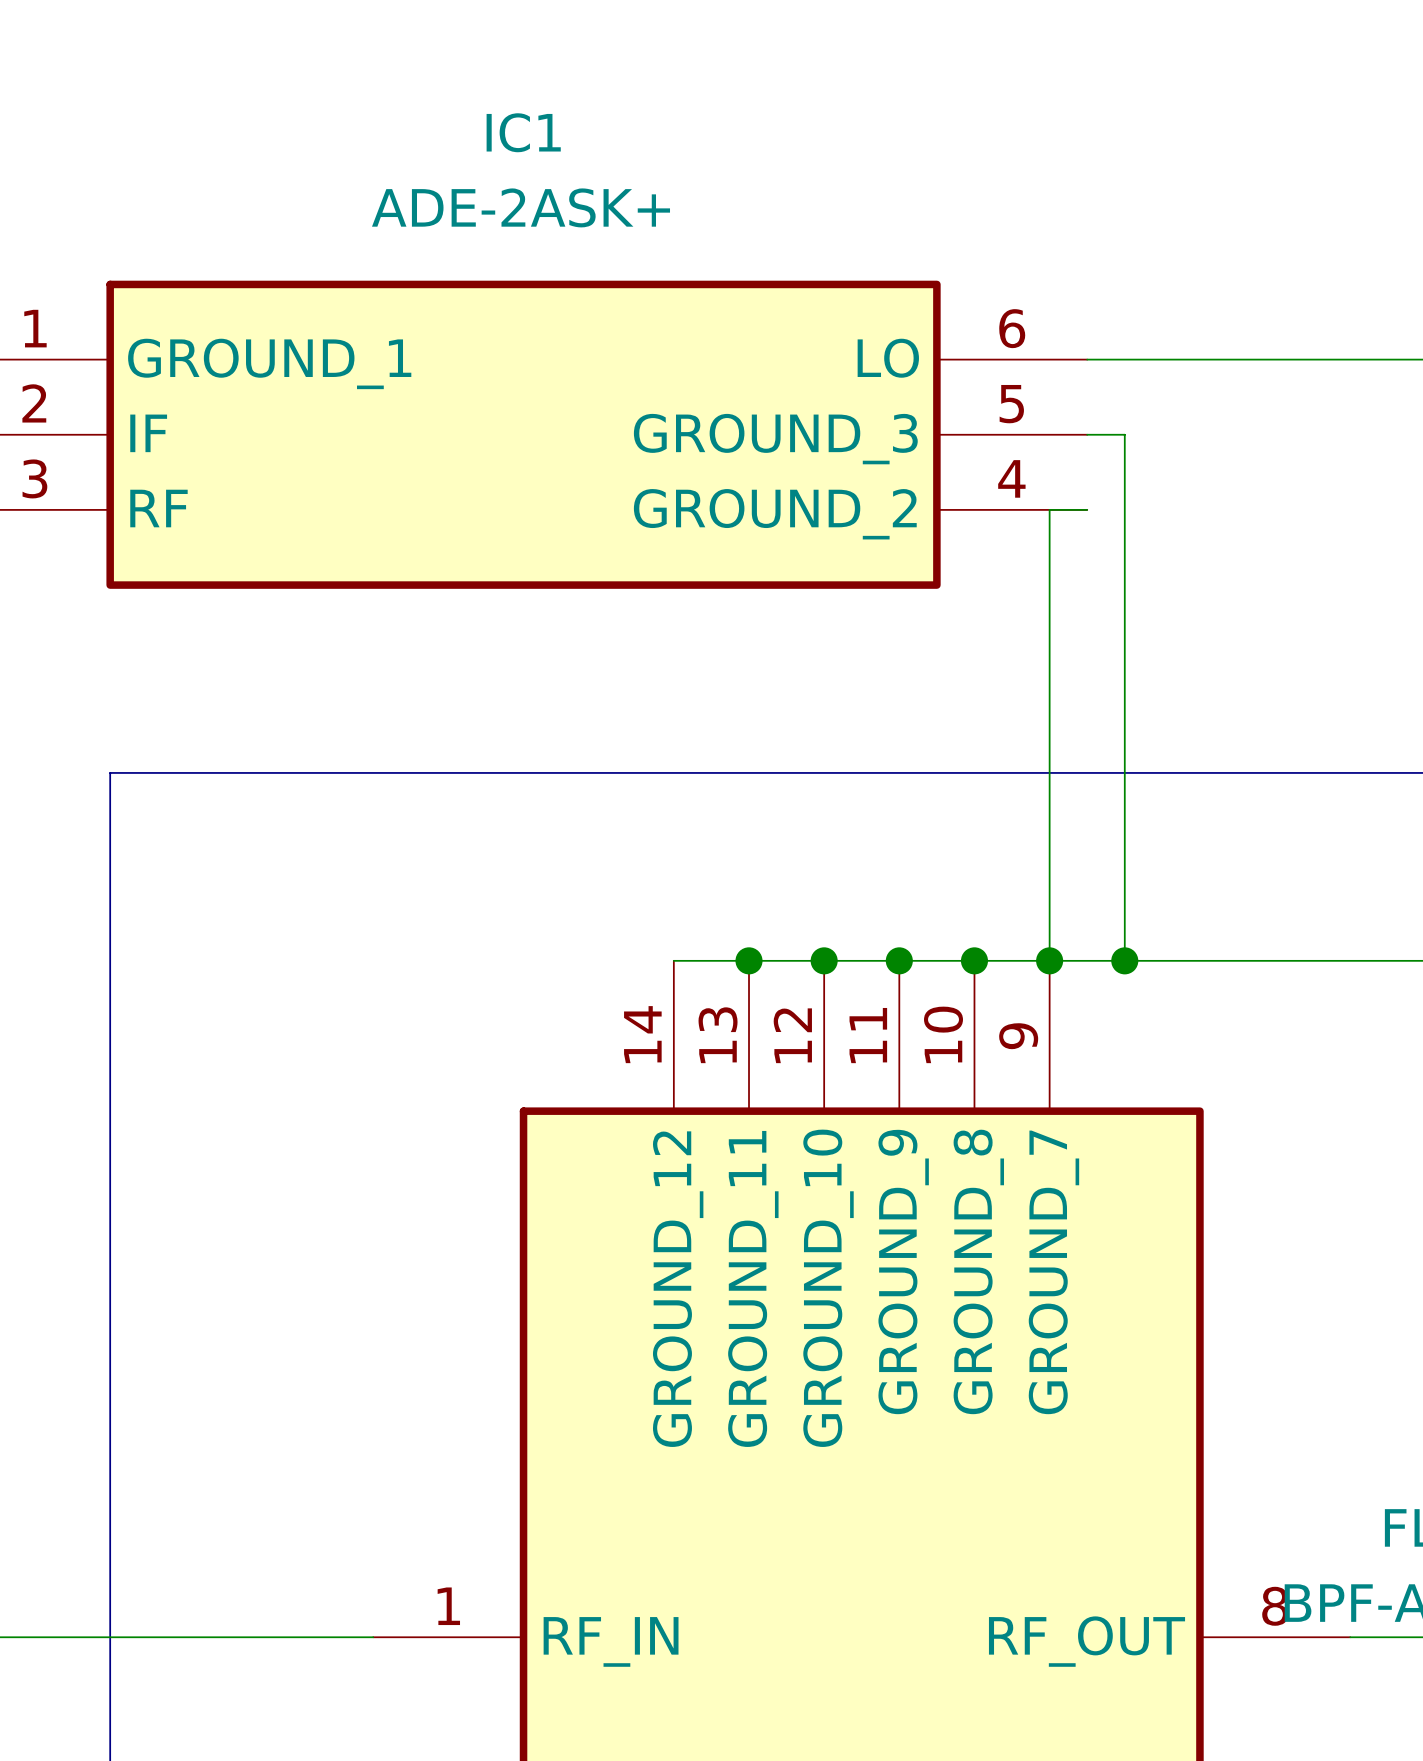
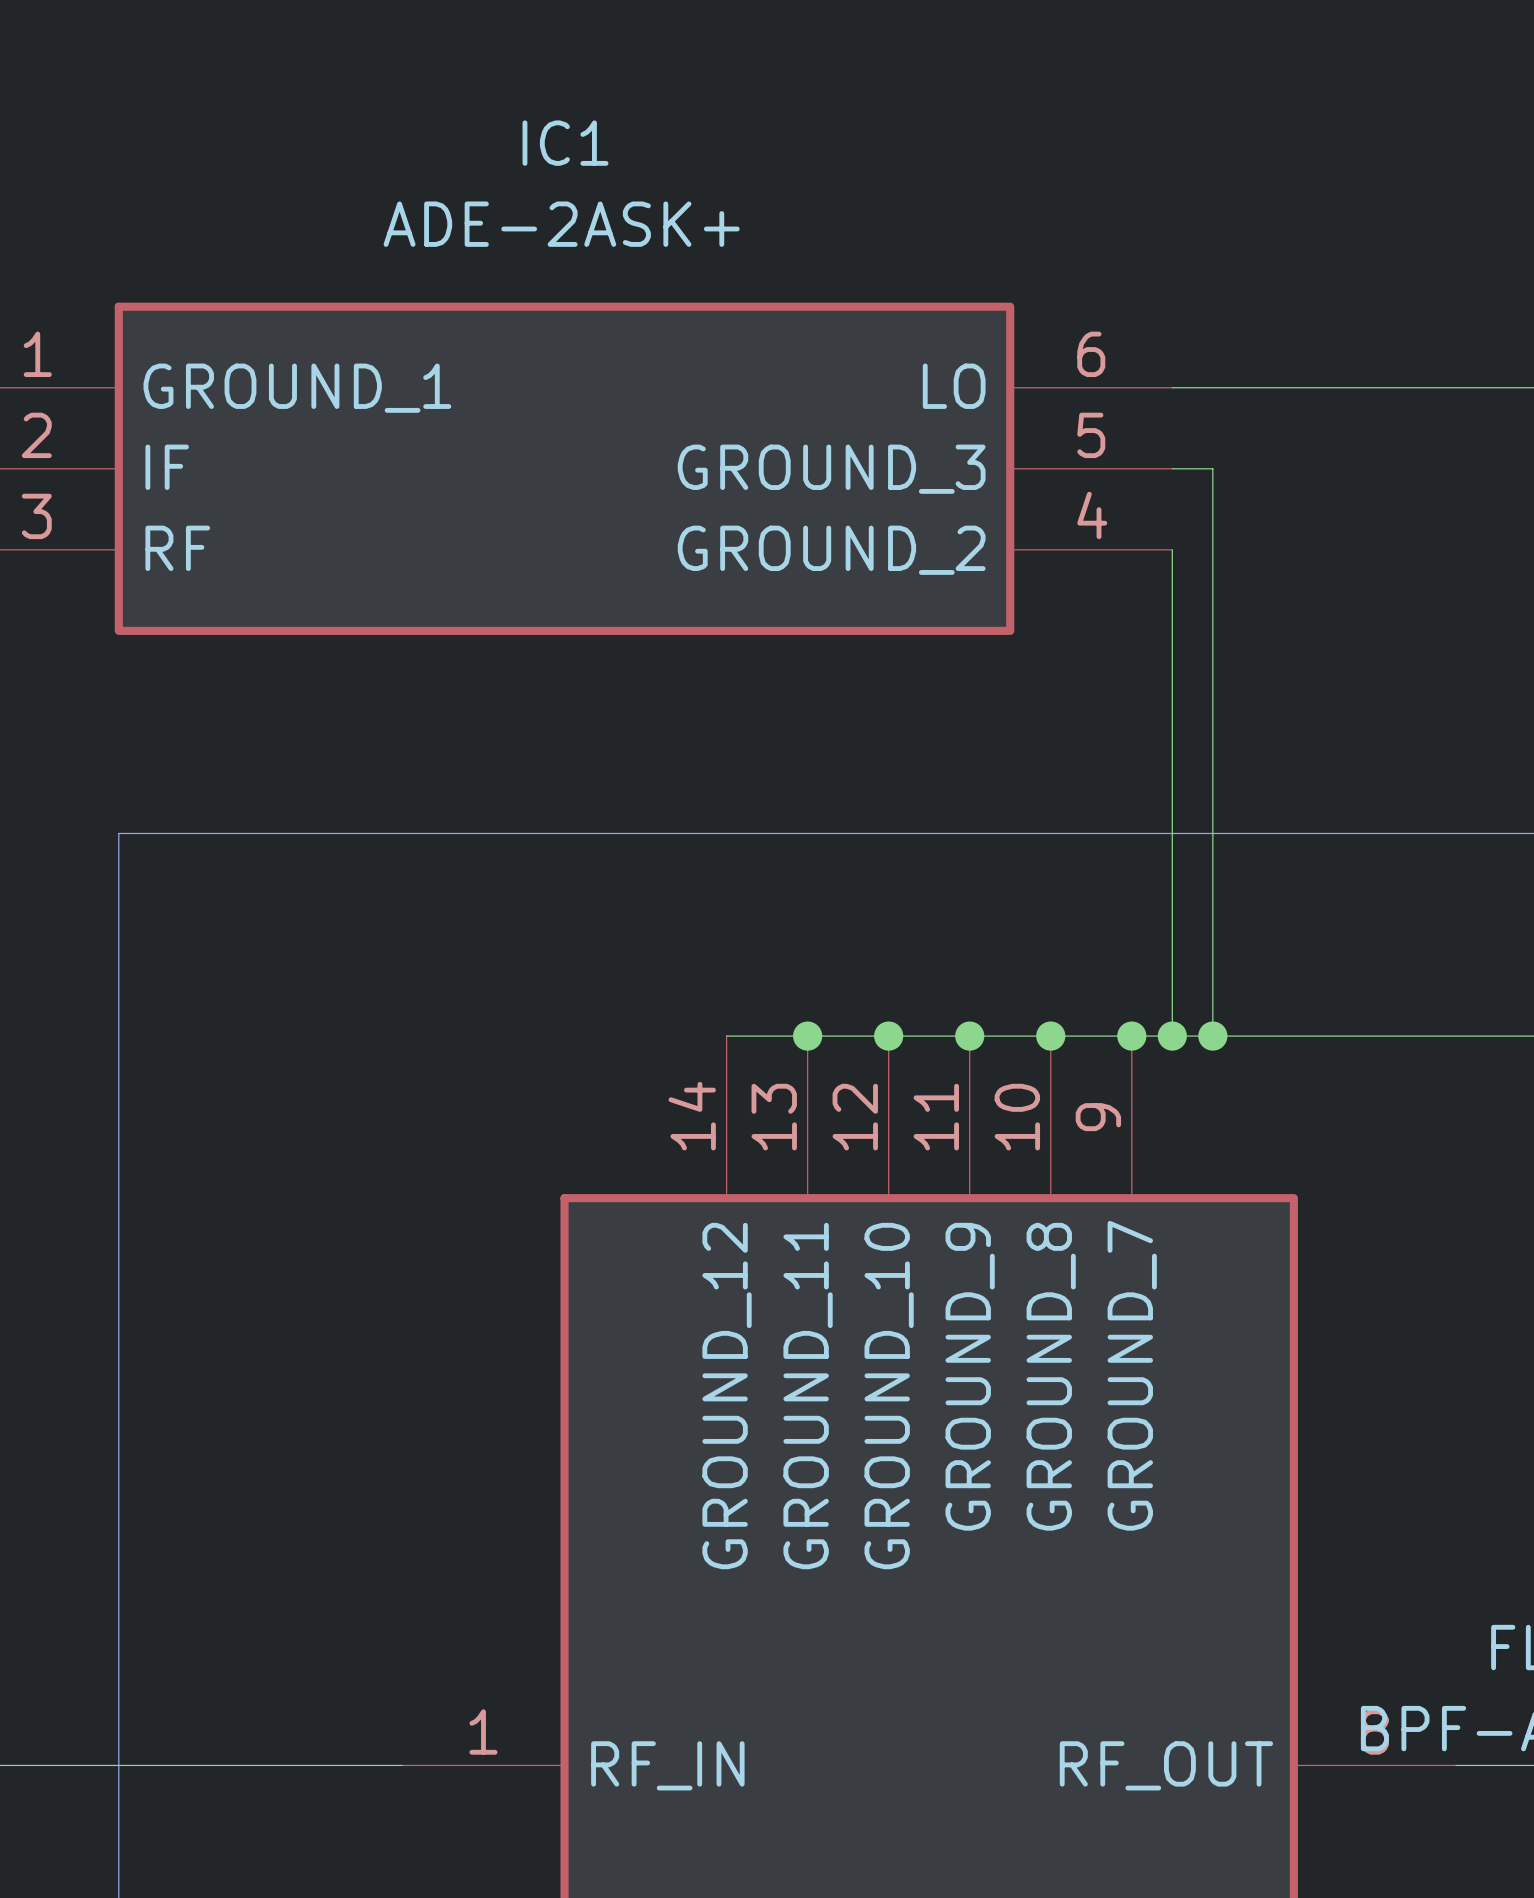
wire: (1087, 509) (1049, 509) (1049, 960) -> (1172, 549) (1172, 1036)
junction: none -> (1172, 1036)

